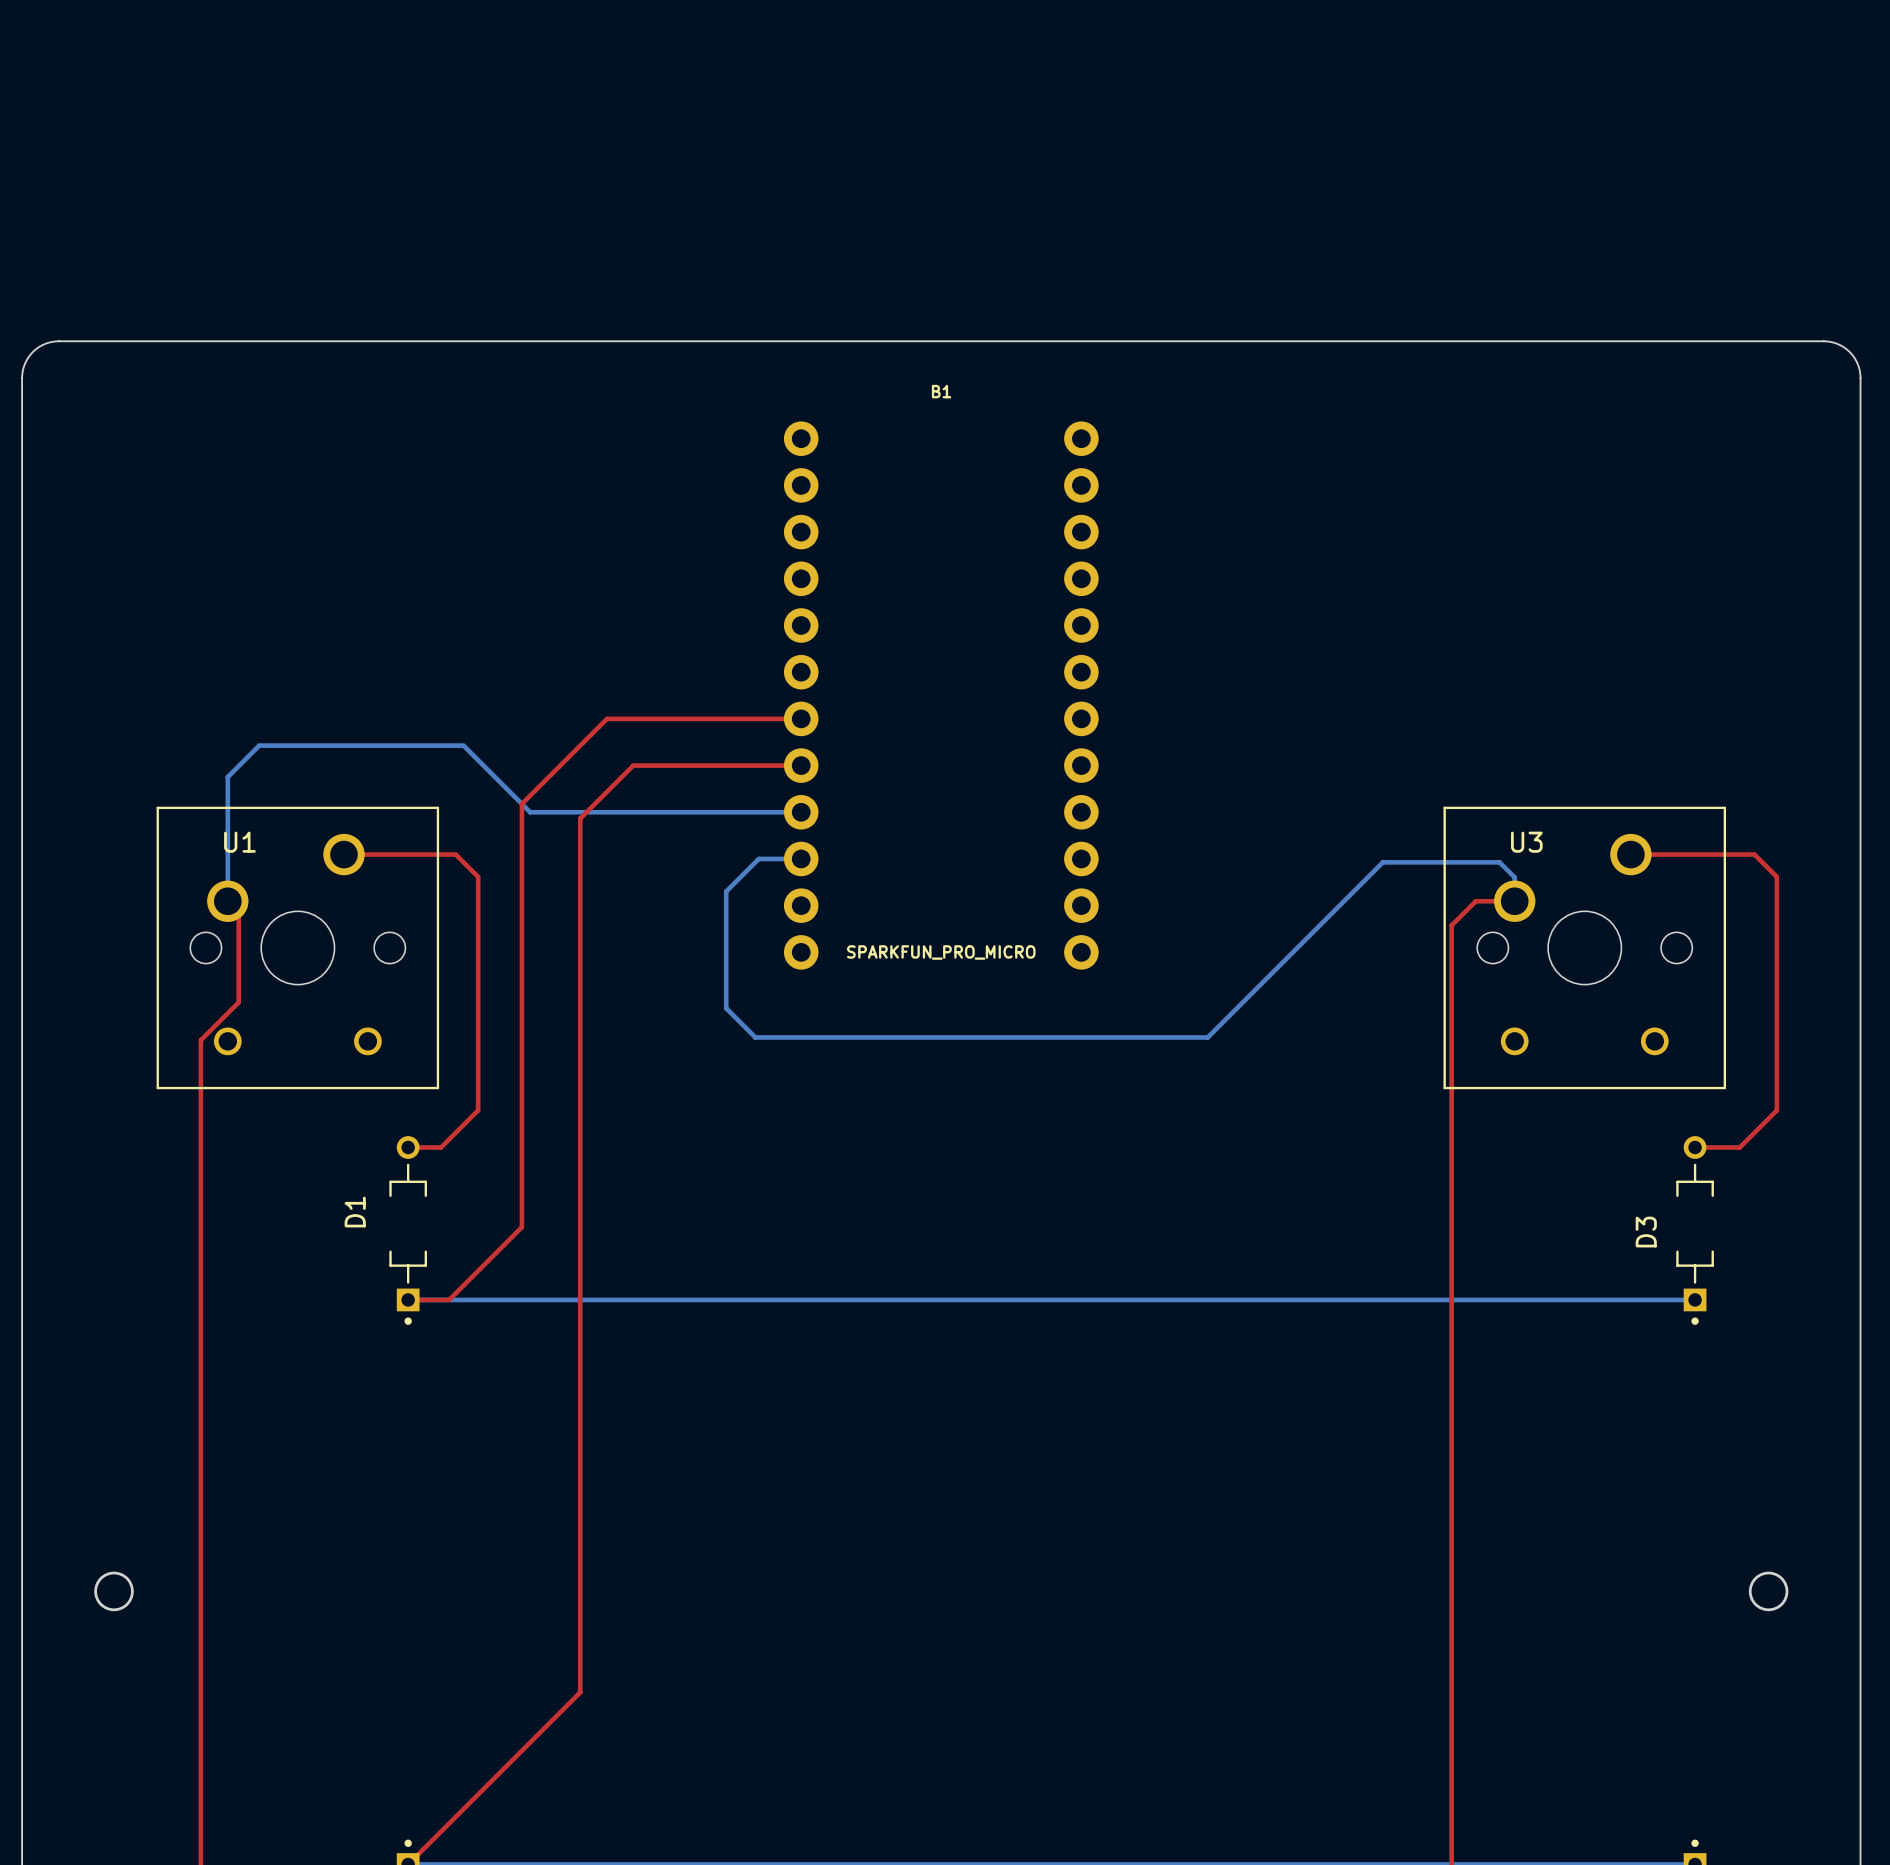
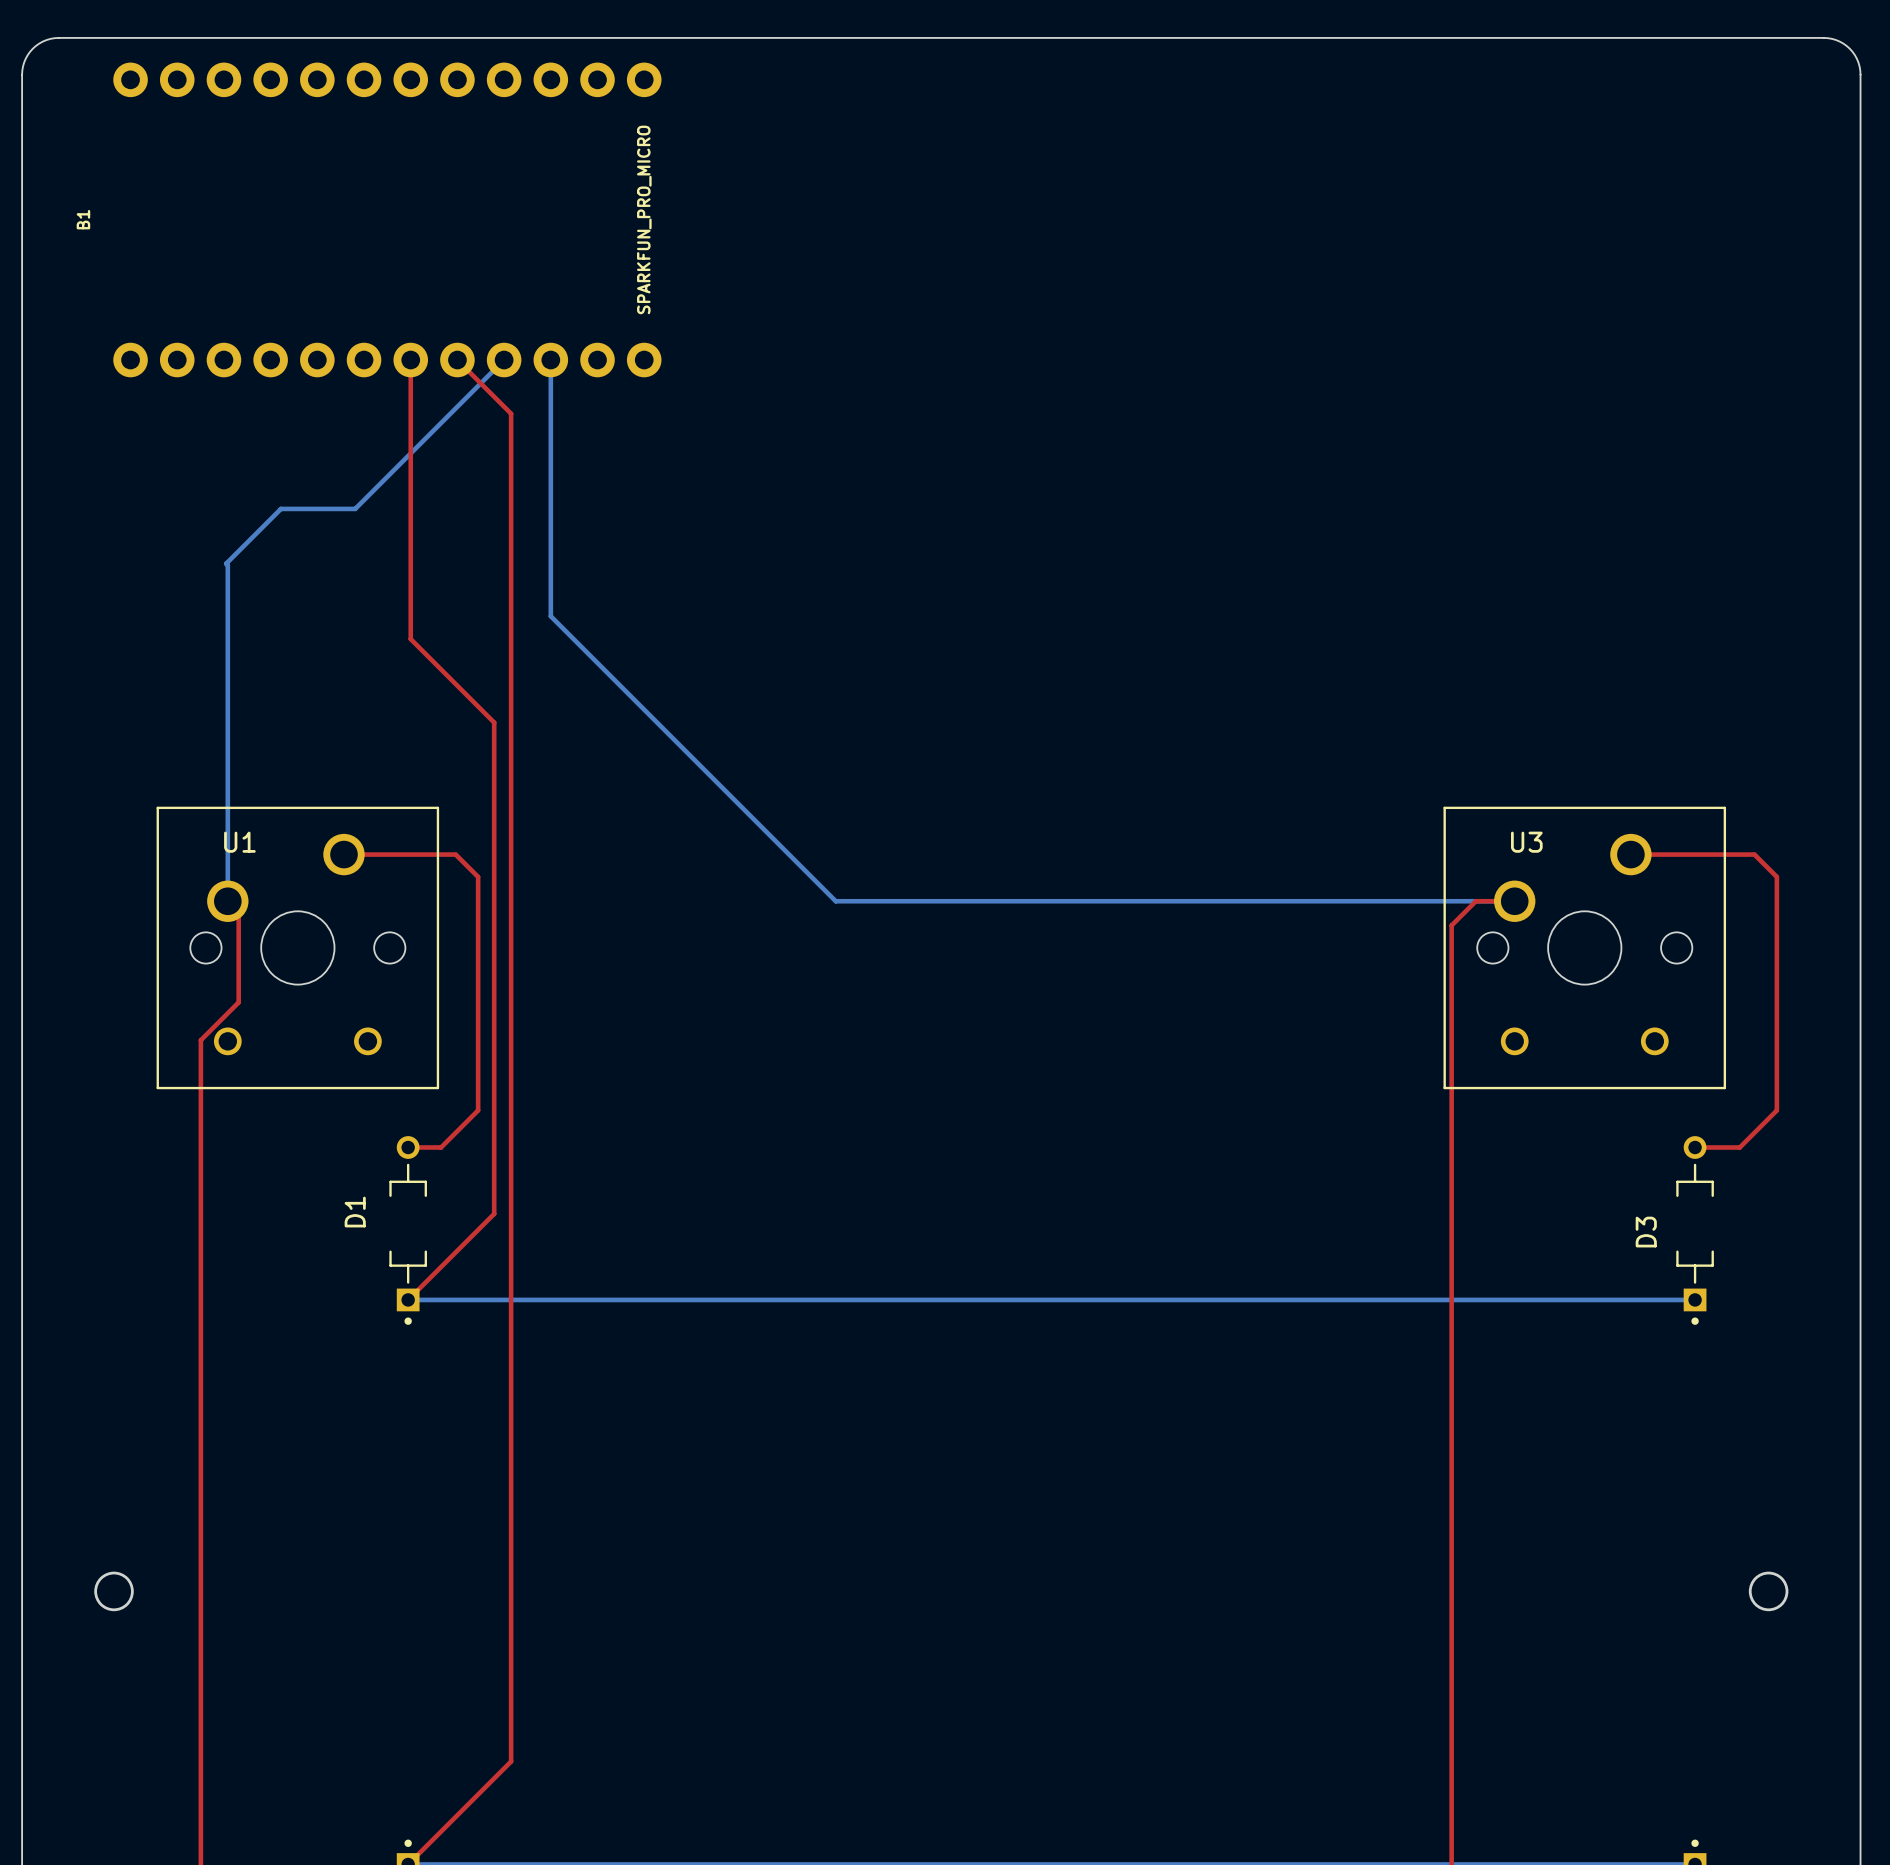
board edge: (22, 378) (24, 365) (32, 352) (42, 344) (58, 341) (1823, 341) (1839, 344) (1849, 352) (1858, 365) (1860, 378) -> (22, 378) (22, 70) (25, 58) (32, 48) (46, 39) (58, 37) (1831, 38) (1843, 43) (1852, 51) (1860, 70) (1860, 378)
B1 name position: B1 (941, 391) -> B1 (83, 219)
B1 rotation: 0° (941, 695) -> 90° clockwise (387, 219)
B1 position: (941, 695) -> (387, 219)
top track: (801, 718) (607, 718) (521, 803) (521, 1227) (449, 1299) (408, 1299) -> (410, 360) (410, 639) (494, 722) (494, 1213) (408, 1299)
top track: (801, 765) (633, 765) (580, 818) (580, 1692) (511, 1761) -> (457, 360) (511, 413) (511, 1761)
bottom track: (227, 777) (259, 745) (463, 745) (530, 812) (801, 812) -> (227, 777) (227, 565) (226, 563) (280, 508) (355, 508) (504, 360)
bottom track: (801, 858) (758, 858) (726, 891) (726, 1008) (755, 1037) (1207, 1037) (1382, 862) (1499, 862) (1514, 877) (1514, 901) -> (550, 360) (550, 616) (835, 901) (1514, 901)
B1 value position: SPARKFUN_PRO_MICRO (941, 952) -> SPARKFUN_PRO_MICRO (644, 219)

